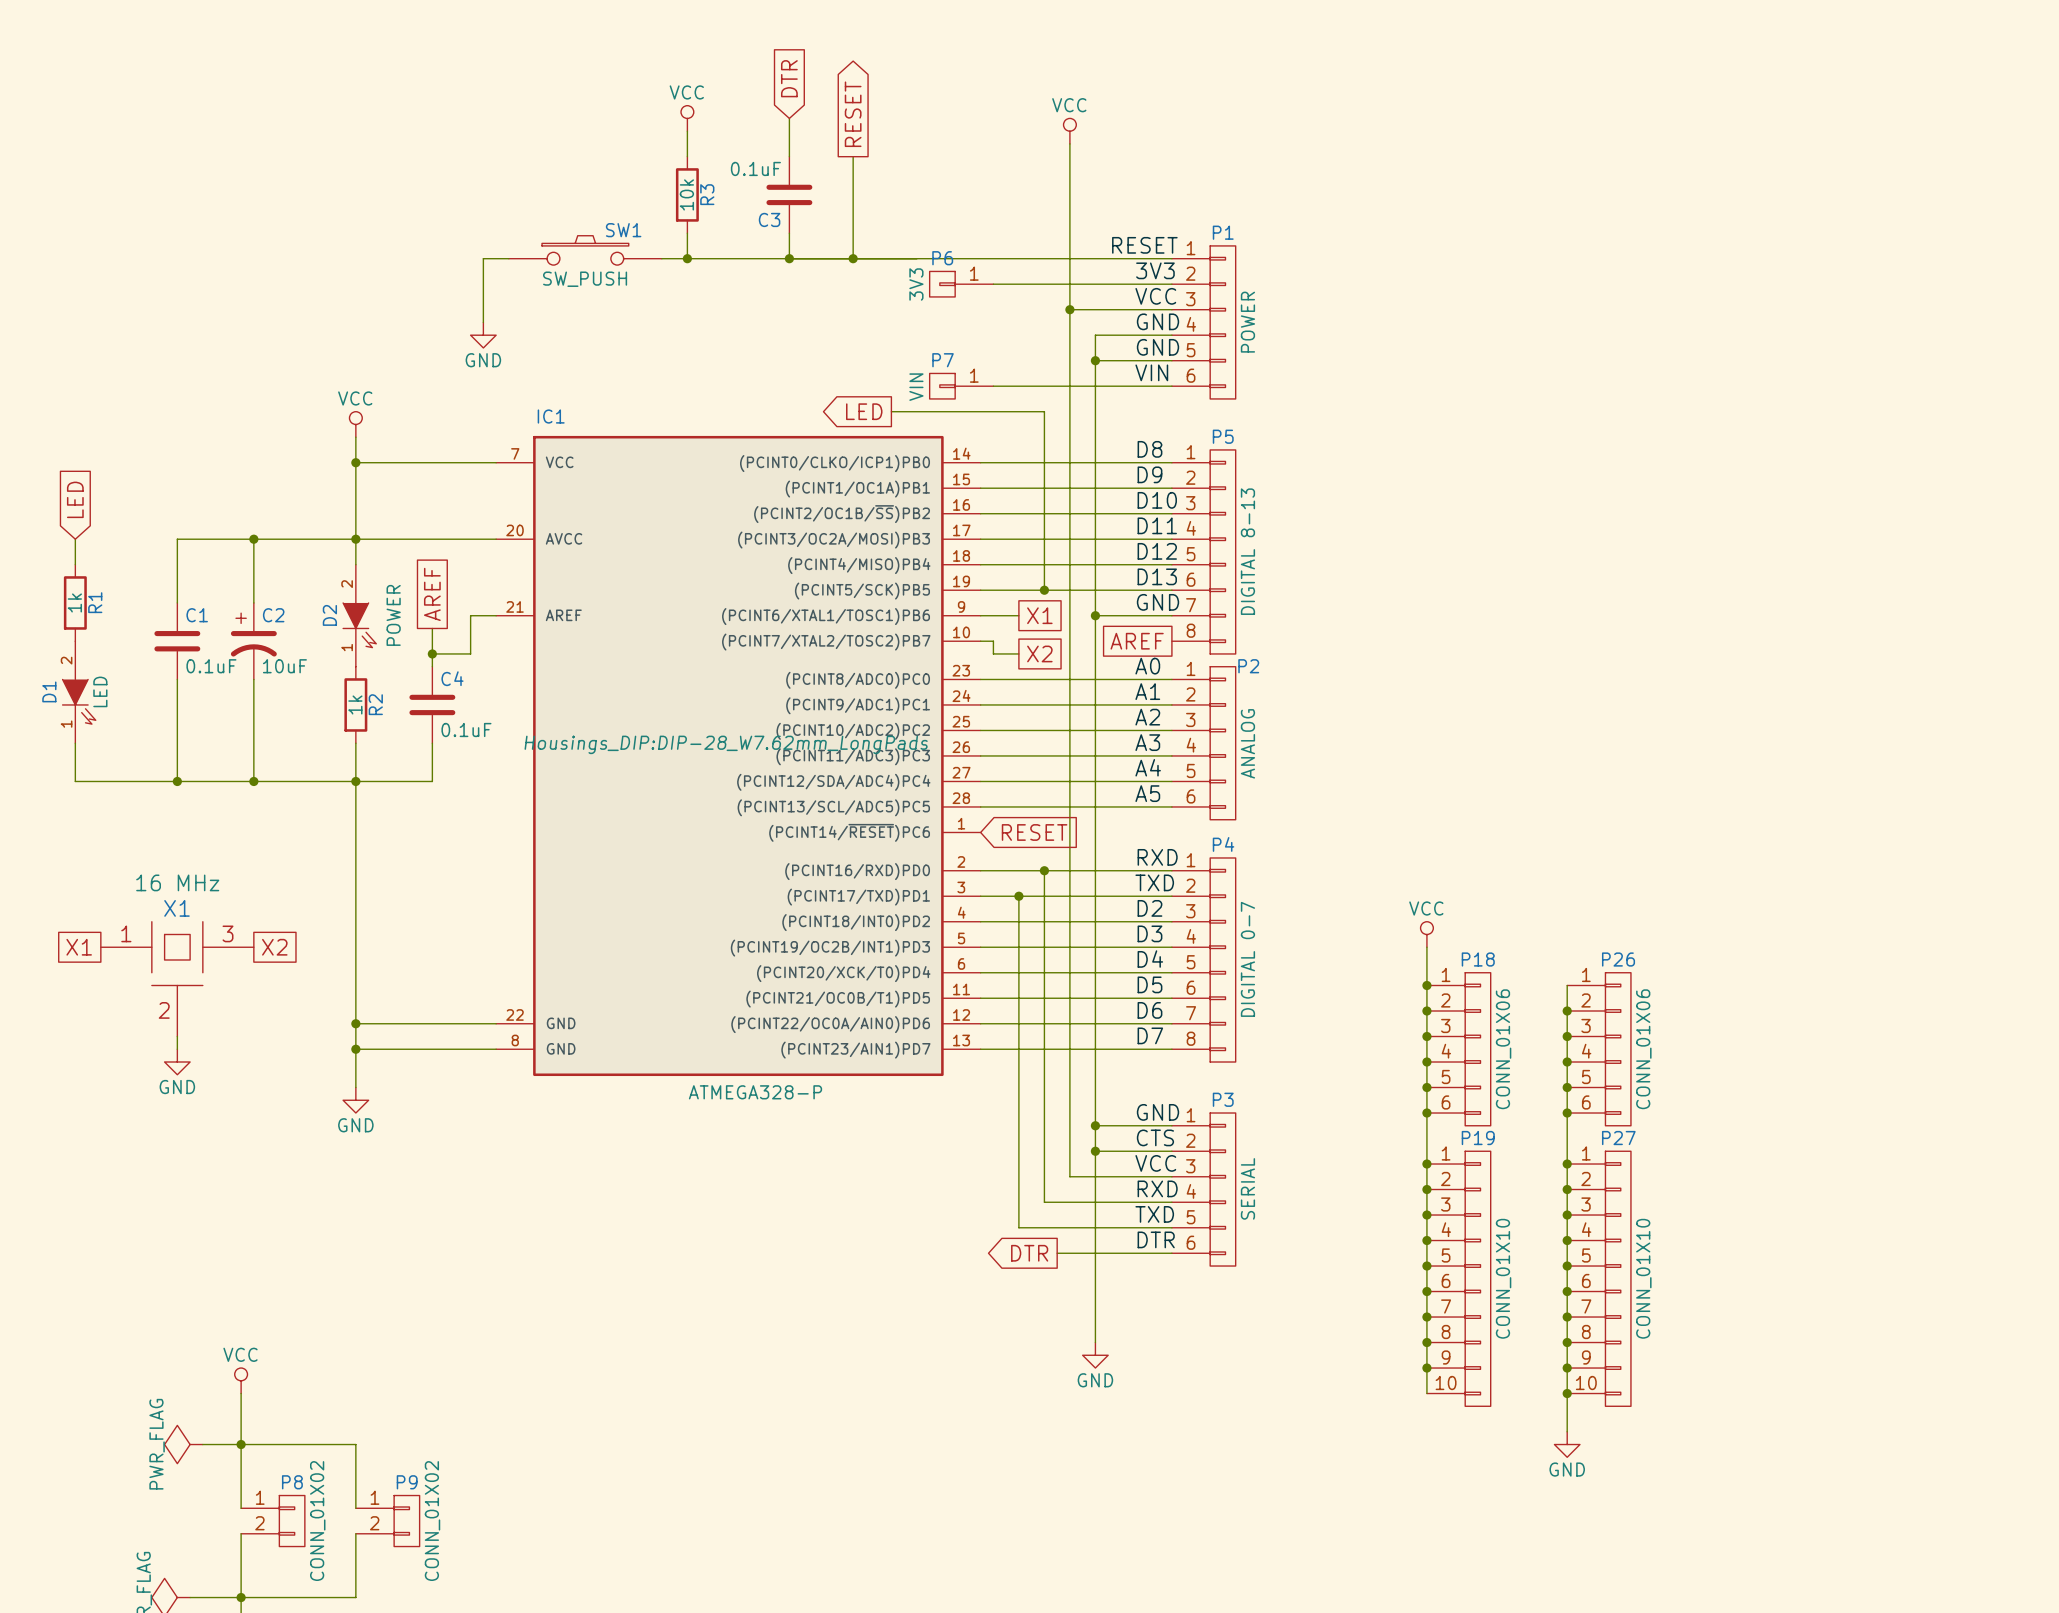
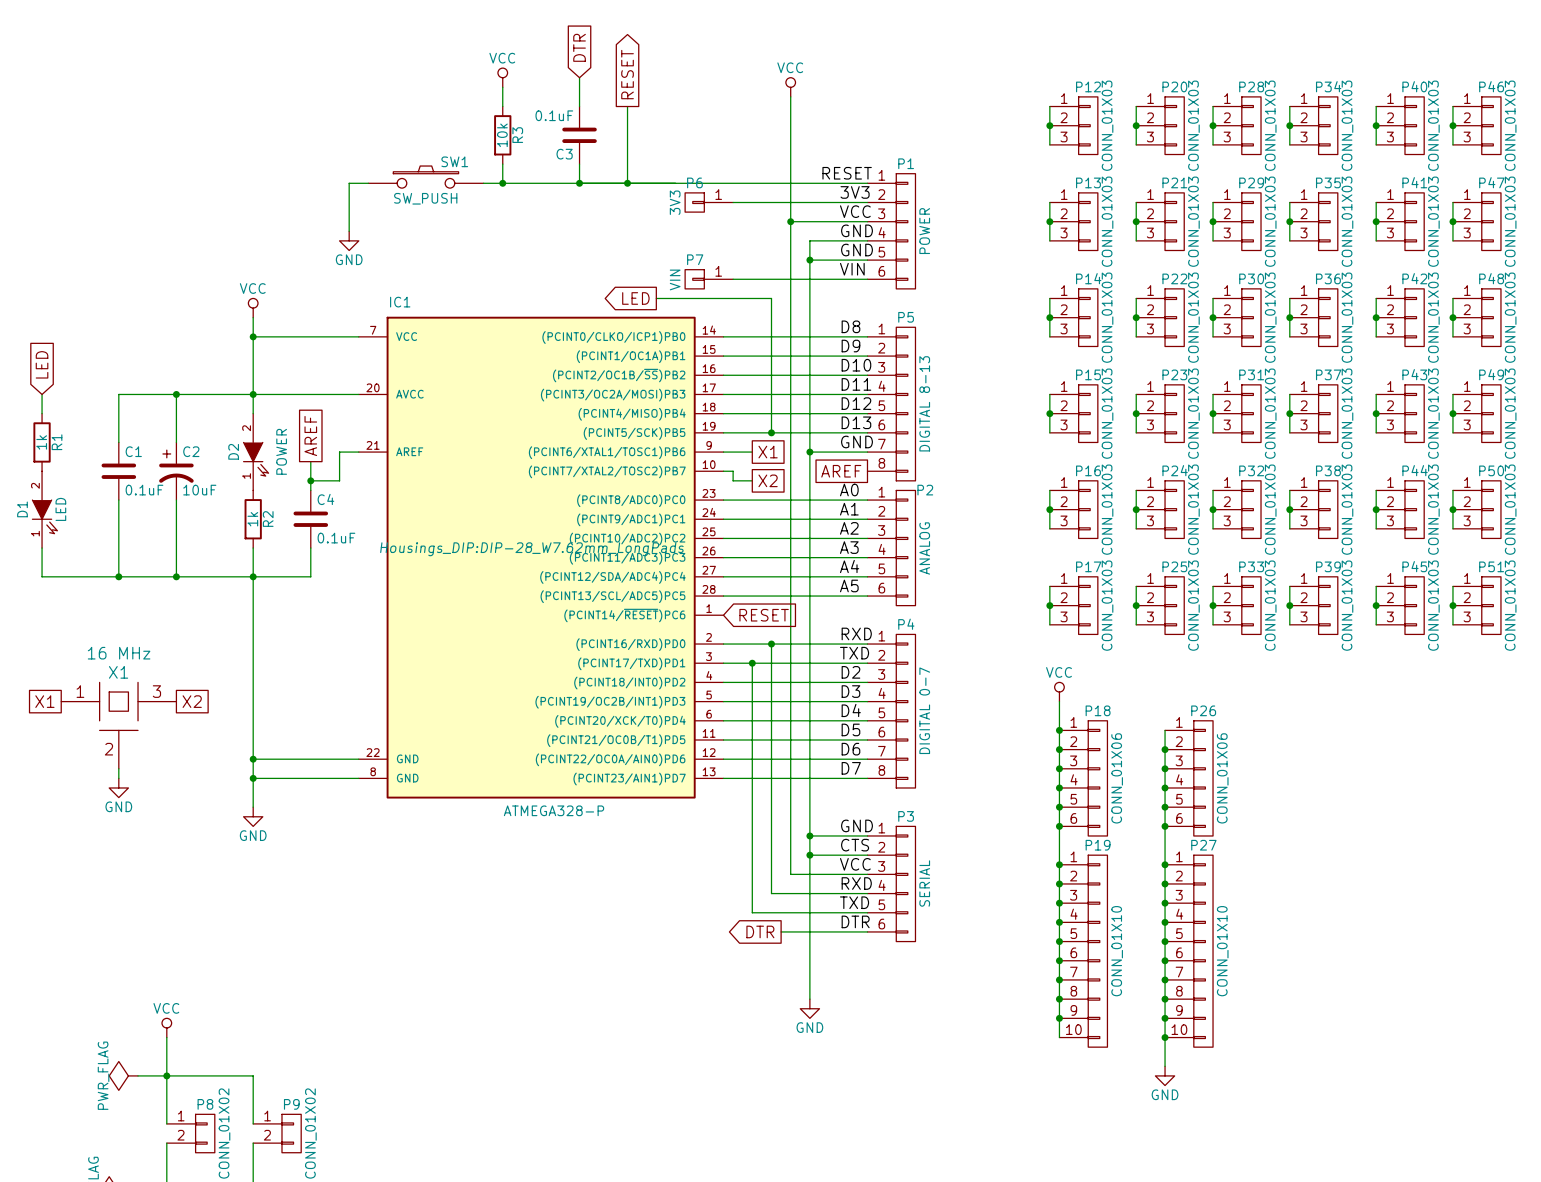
wire: none -> (1049, 106) (1049, 144)
wire: none -> (1136, 106) (1136, 144)
wire: none -> (1213, 106) (1213, 144)
wire: none -> (1289, 106) (1289, 144)
wire: none -> (1376, 106) (1376, 144)
wire: none -> (1452, 106) (1452, 144)
junction: none -> (1049, 125)
P12: none -> CONN_01X03 (1073, 125)
junction: none -> (1136, 125)
P20: none -> CONN_01X03 (1160, 125)
junction: none -> (1213, 125)
P28: none -> CONN_01X03 (1237, 125)
junction: none -> (1289, 125)
P34: none -> CONN_01X03 (1313, 125)
junction: none -> (1376, 125)
P40: none -> CONN_01X03 (1400, 125)
junction: none -> (1452, 125)
P46: none -> CONN_01X03 (1476, 125)
wire: none -> (1049, 202) (1049, 240)
wire: none -> (1136, 202) (1136, 240)
wire: none -> (1213, 202) (1213, 240)
wire: none -> (1289, 202) (1289, 240)
wire: none -> (1376, 202) (1376, 240)
wire: none -> (1452, 202) (1452, 240)
junction: none -> (1049, 221)
P13: none -> CONN_01X03 (1073, 221)
junction: none -> (1136, 221)
P21: none -> CONN_01X03 (1160, 221)
junction: none -> (1213, 221)
P29: none -> CONN_01X03 (1237, 221)
junction: none -> (1289, 221)
P35: none -> CONN_01X03 (1313, 221)
junction: none -> (1376, 221)
P41: none -> CONN_01X03 (1400, 221)
junction: none -> (1452, 221)
P47: none -> CONN_01X03 (1476, 221)
wire: none -> (1049, 298) (1049, 336)
wire: none -> (1136, 298) (1136, 336)
wire: none -> (1213, 298) (1213, 336)
wire: none -> (1289, 298) (1289, 336)
wire: none -> (1376, 298) (1376, 336)
wire: none -> (1452, 298) (1452, 336)
junction: none -> (1049, 317)
P14: none -> CONN_01X03 (1073, 317)
junction: none -> (1136, 317)
P22: none -> CONN_01X03 (1160, 317)
junction: none -> (1213, 317)
P30: none -> CONN_01X03 (1237, 317)
junction: none -> (1289, 317)
P36: none -> CONN_01X03 (1313, 317)
junction: none -> (1376, 317)
P42: none -> CONN_01X03 (1400, 317)
junction: none -> (1452, 317)
P48: none -> CONN_01X03 (1476, 317)
wire: none -> (1049, 394) (1049, 432)
wire: none -> (1136, 394) (1136, 432)
wire: none -> (1213, 394) (1213, 432)
wire: none -> (1289, 394) (1289, 432)
wire: none -> (1376, 394) (1376, 432)
wire: none -> (1452, 394) (1452, 432)
junction: none -> (1049, 413)
P15: none -> CONN_01X03 (1073, 413)
junction: none -> (1136, 413)
P23: none -> CONN_01X03 (1160, 413)
junction: none -> (1213, 413)
P31: none -> CONN_01X03 (1237, 413)
junction: none -> (1289, 413)
P37: none -> CONN_01X03 (1313, 413)
junction: none -> (1376, 413)
P43: none -> CONN_01X03 (1400, 413)
junction: none -> (1452, 413)
P49: none -> CONN_01X03 (1476, 413)
wire: none -> (1049, 490) (1049, 528)
wire: none -> (1136, 490) (1136, 528)
wire: none -> (1213, 490) (1213, 528)
wire: none -> (1289, 490) (1289, 528)
wire: none -> (1376, 490) (1376, 528)
wire: none -> (1452, 490) (1452, 528)
junction: none -> (1049, 509)
P16: none -> CONN_01X03 (1073, 509)
junction: none -> (1136, 509)
P24: none -> CONN_01X03 (1160, 509)
junction: none -> (1213, 509)
P32: none -> CONN_01X03 (1237, 509)
junction: none -> (1289, 509)
P38: none -> CONN_01X03 (1313, 509)
junction: none -> (1376, 509)
P44: none -> CONN_01X03 (1400, 509)
junction: none -> (1452, 509)
P50: none -> CONN_01X03 (1476, 509)
wire: none -> (1049, 586) (1049, 624)
wire: none -> (1136, 586) (1136, 624)
wire: none -> (1213, 586) (1213, 624)
wire: none -> (1289, 586) (1289, 624)
wire: none -> (1376, 586) (1376, 624)
wire: none -> (1452, 586) (1452, 624)
junction: none -> (1049, 605)
P17: none -> CONN_01X03 (1073, 605)
junction: none -> (1136, 605)
P25: none -> CONN_01X03 (1160, 605)
junction: none -> (1213, 605)
P33: none -> CONN_01X03 (1237, 605)
junction: none -> (1289, 605)
P39: none -> CONN_01X03 (1313, 605)
junction: none -> (1376, 605)
P45: none -> CONN_01X03 (1400, 605)
junction: none -> (1452, 605)
P51: none -> CONN_01X03 (1476, 605)

